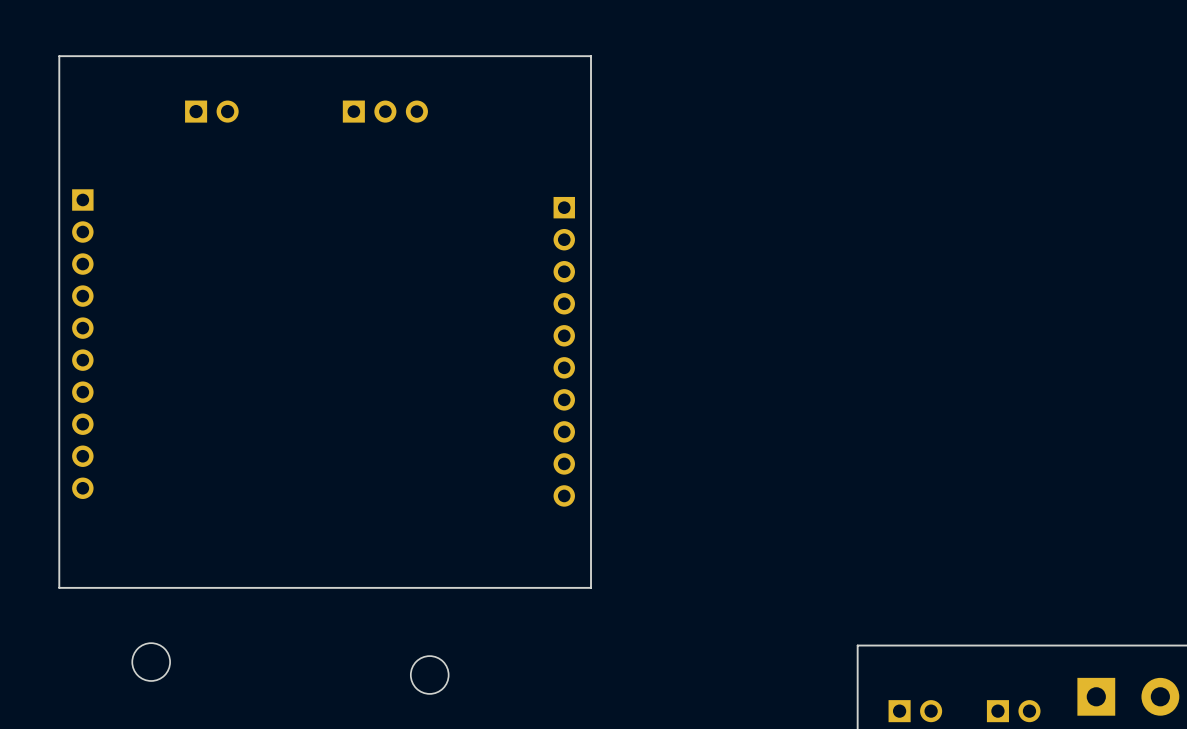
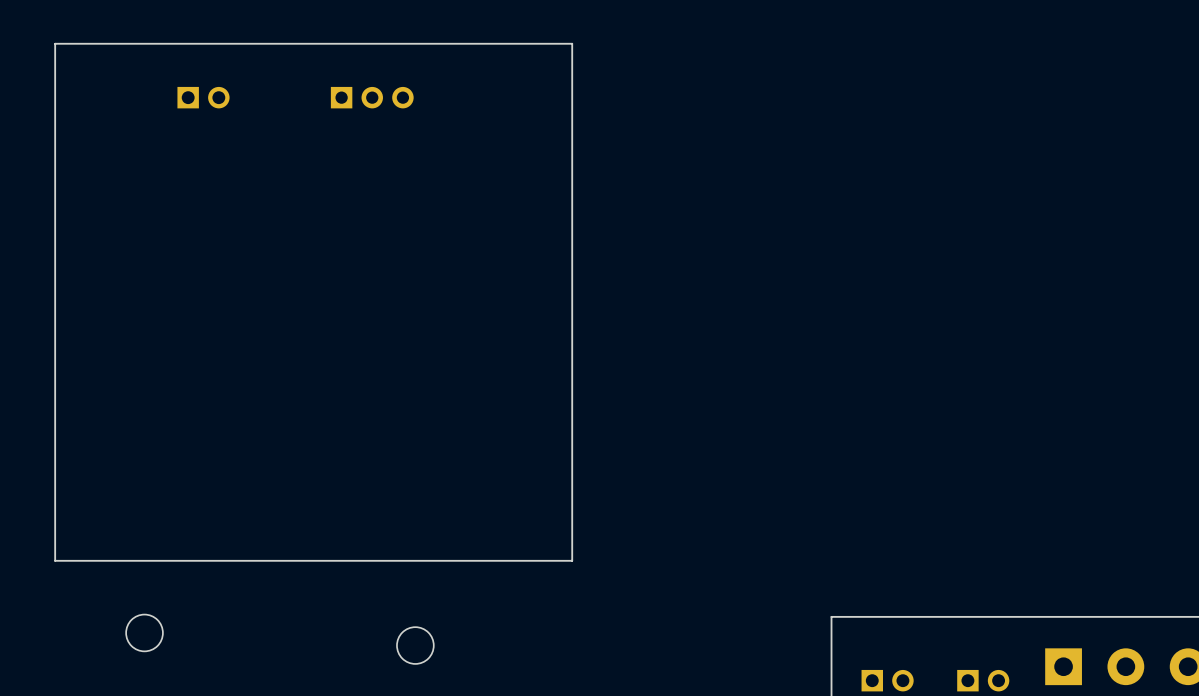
part: (82, 344) -> none
part: (564, 351) -> none

